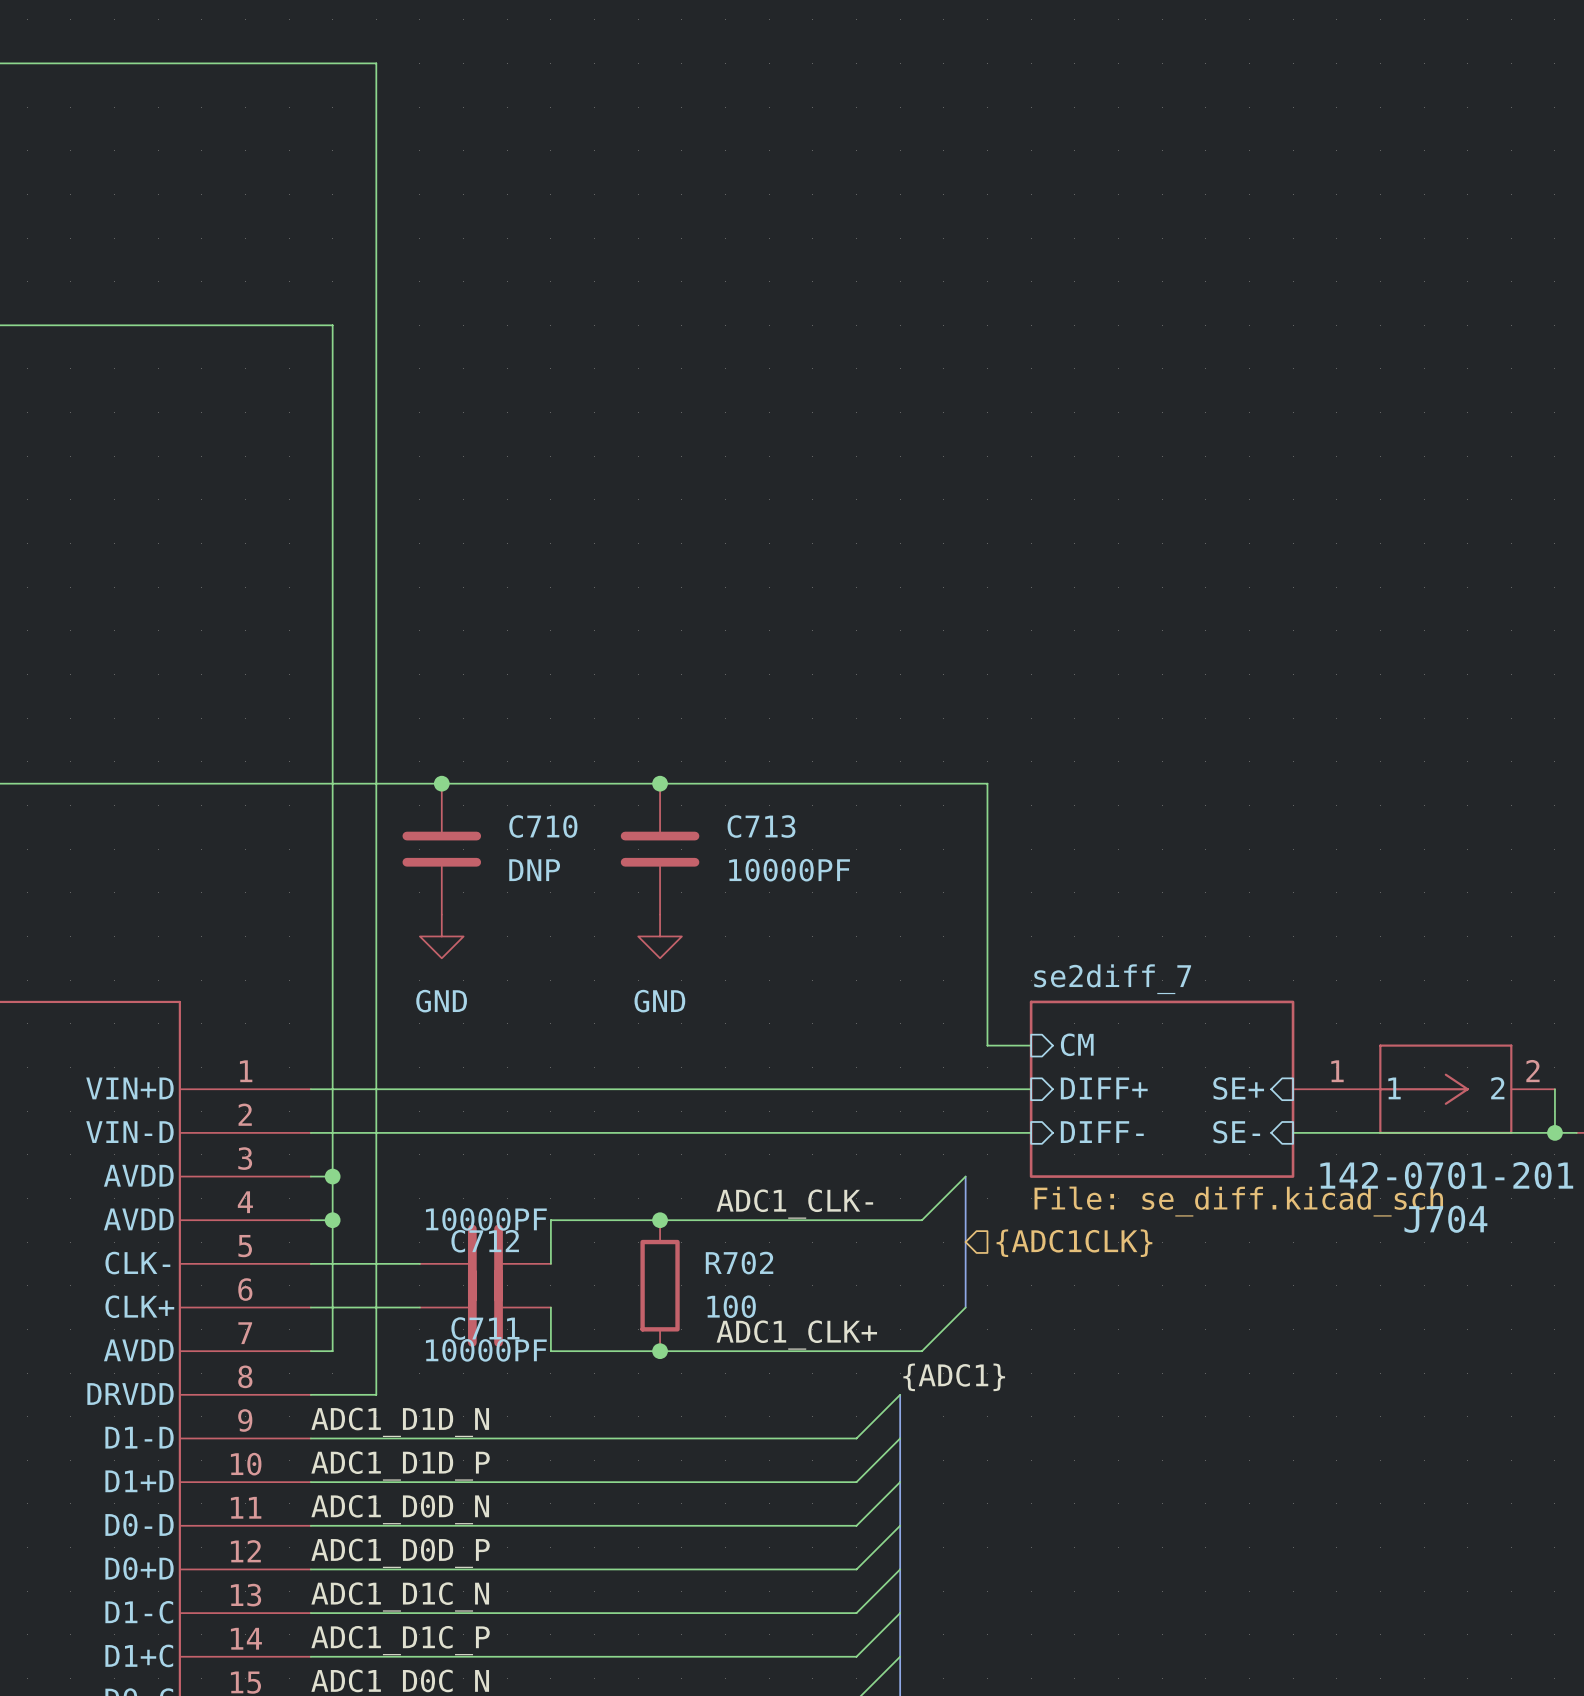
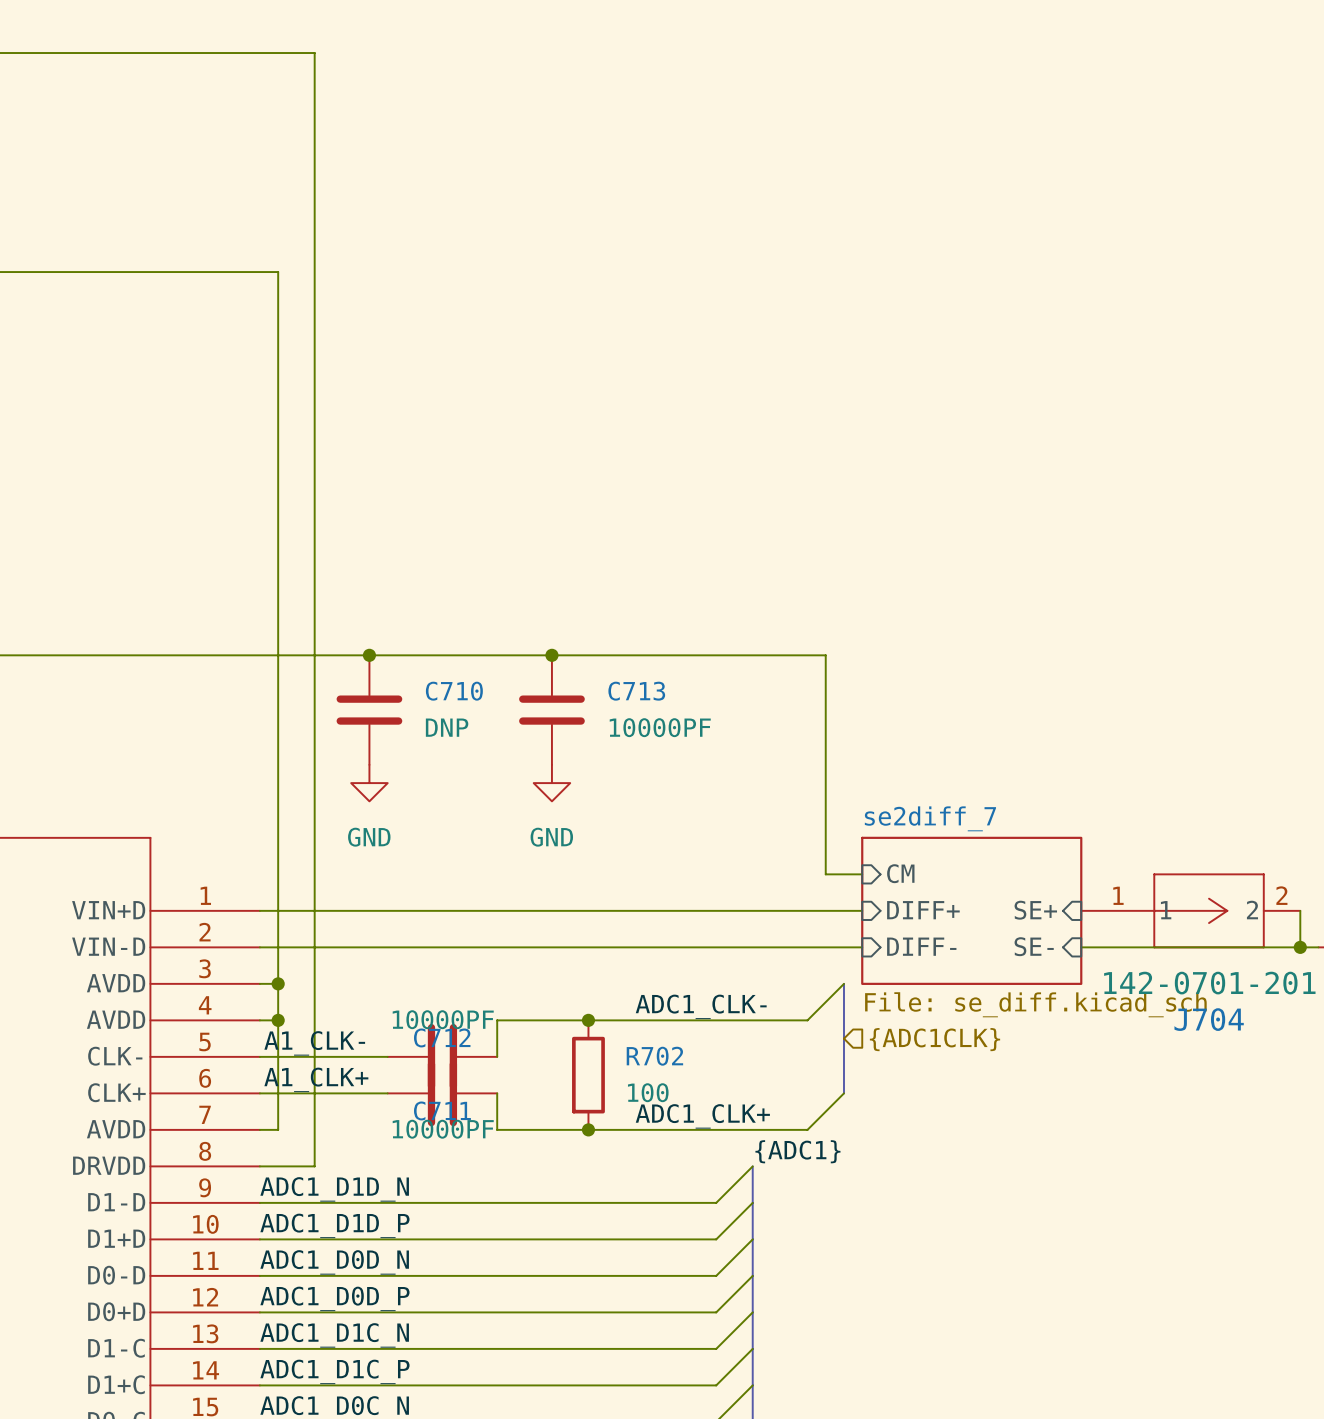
wire: (965, 1176) (921, 1220) -> (843, 983) (807, 1020) (770, 1020)
bus: (965, 1176) (965, 1307) -> (843, 983) (843, 1093)
label position: ADC1_CLK- (794, 1204) -> ADC1_CLK- (701, 1006)
wire: (594, 1220) (550, 1220) (550, 1263) -> (497, 1020) (497, 1056)
junction position: (660, 1220) -> (588, 1020)
hierarchical label position: {ADC1CLK} (1074, 1243) -> {ADC1CLK} (935, 1039)
label: none -> A1_CLK- (314, 1043)
C711 position: (485, 1263) -> (442, 1056)
R702 position: (660, 1285) -> (588, 1075)
label: none -> A1_CLK+ (316, 1079)
C712 position: (485, 1307) -> (442, 1093)
wire: (550, 1307) (550, 1351) (594, 1351) -> (497, 1093) (497, 1129)
wire: (965, 1307) (921, 1351) -> (843, 1093) (807, 1129) (770, 1129)
label position: ADC1_CLK+ (796, 1335) -> ADC1_CLK+ (702, 1116)
junction position: (660, 1351) -> (588, 1129)

